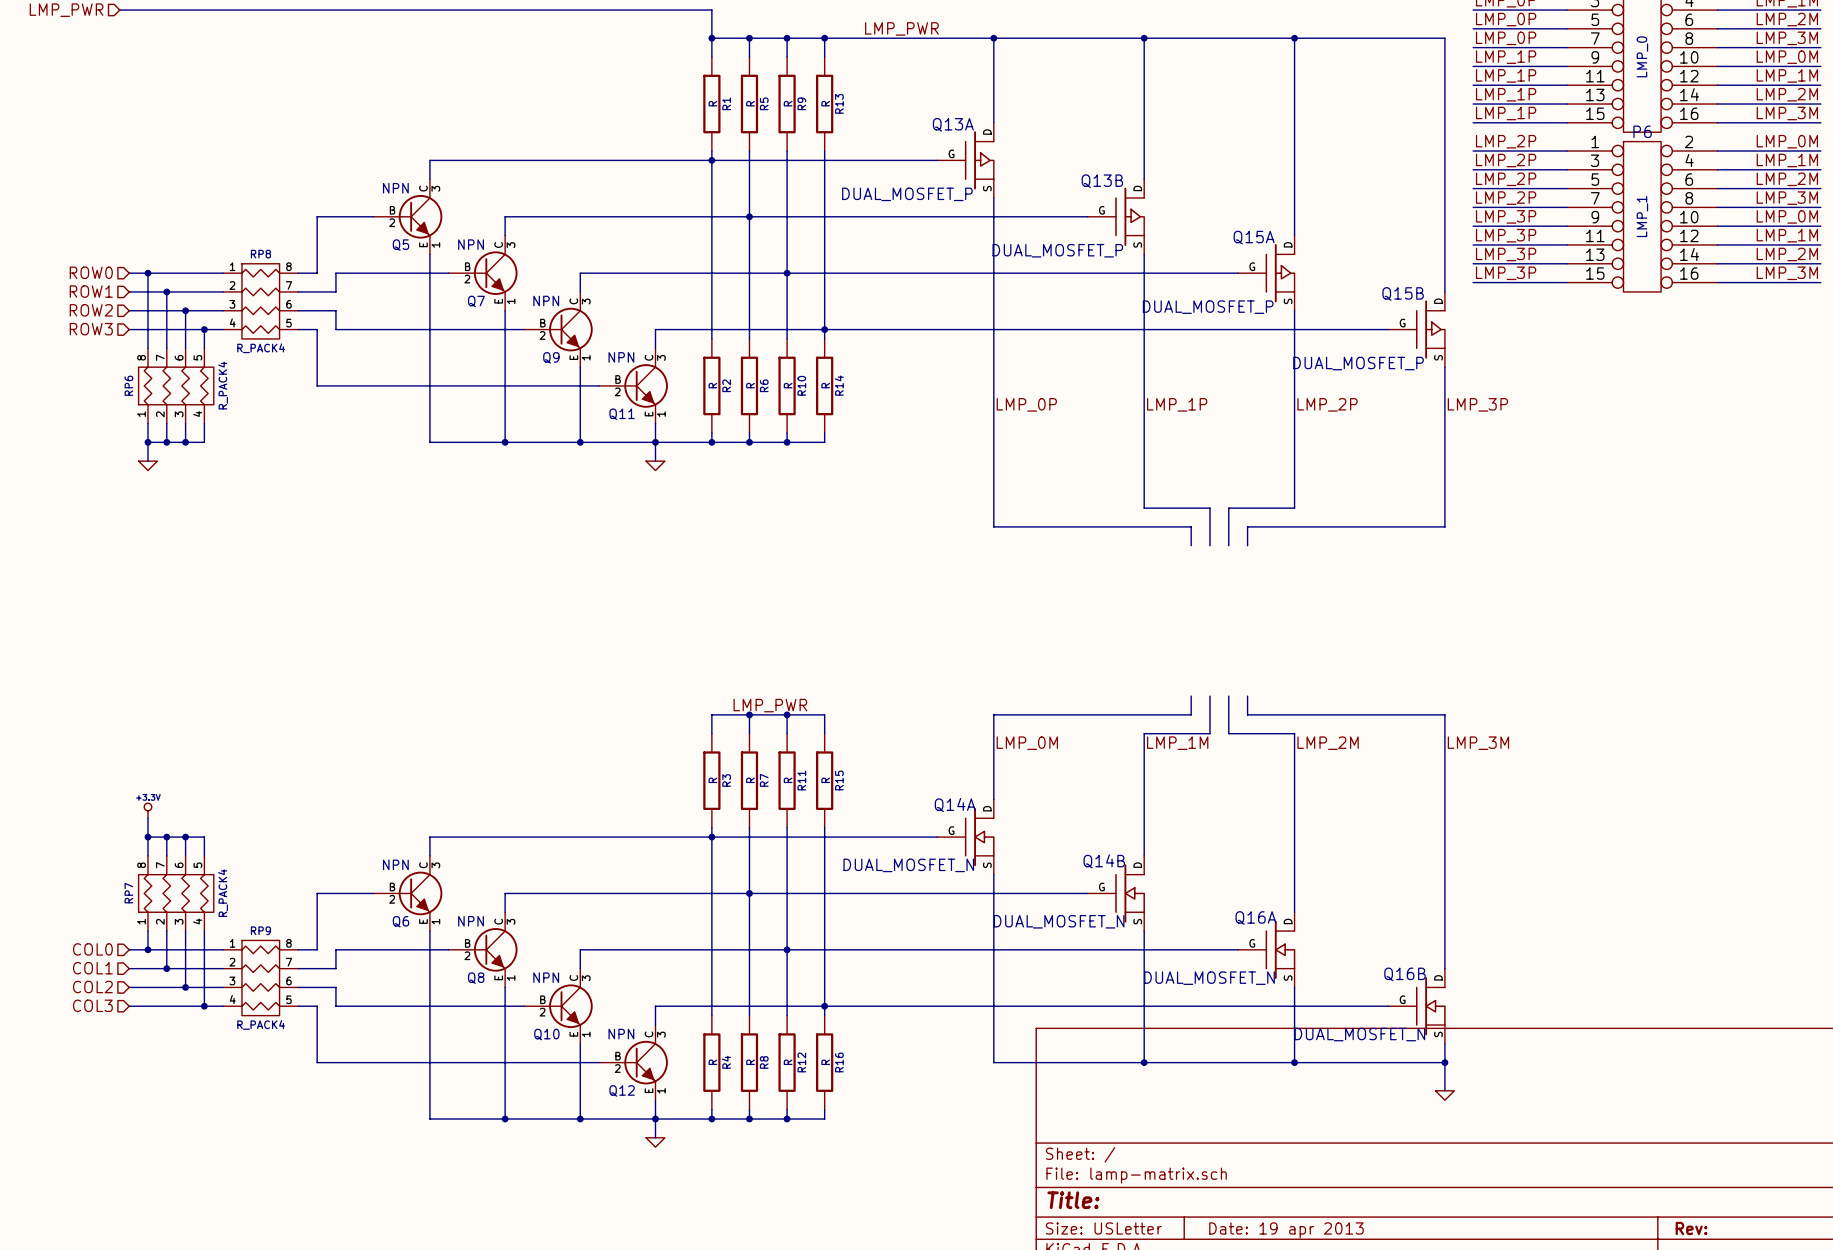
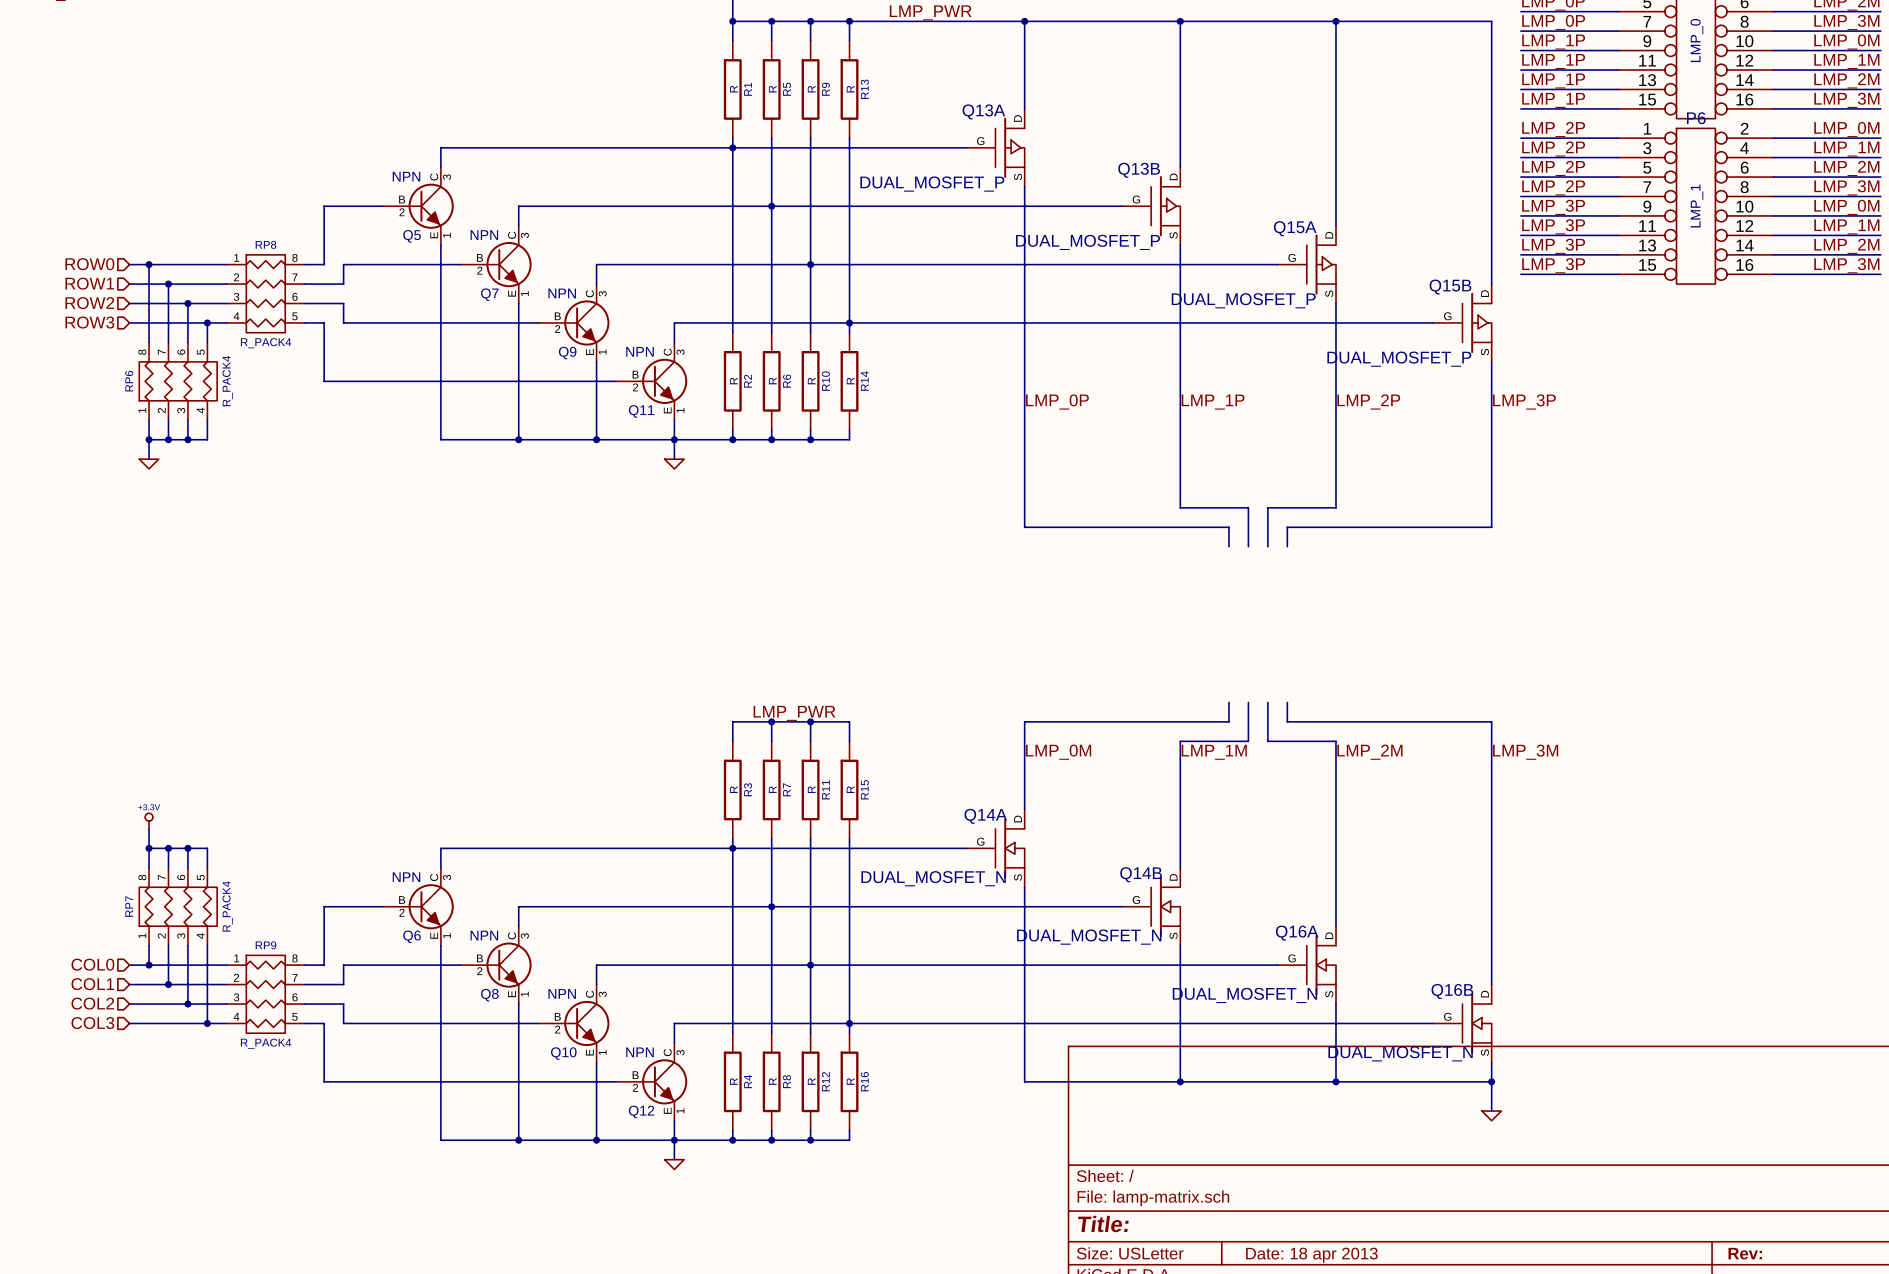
title block: Date: 19 apr 2013 (1286, 1230) -> Date: 18 apr 2013 (1311, 1255)

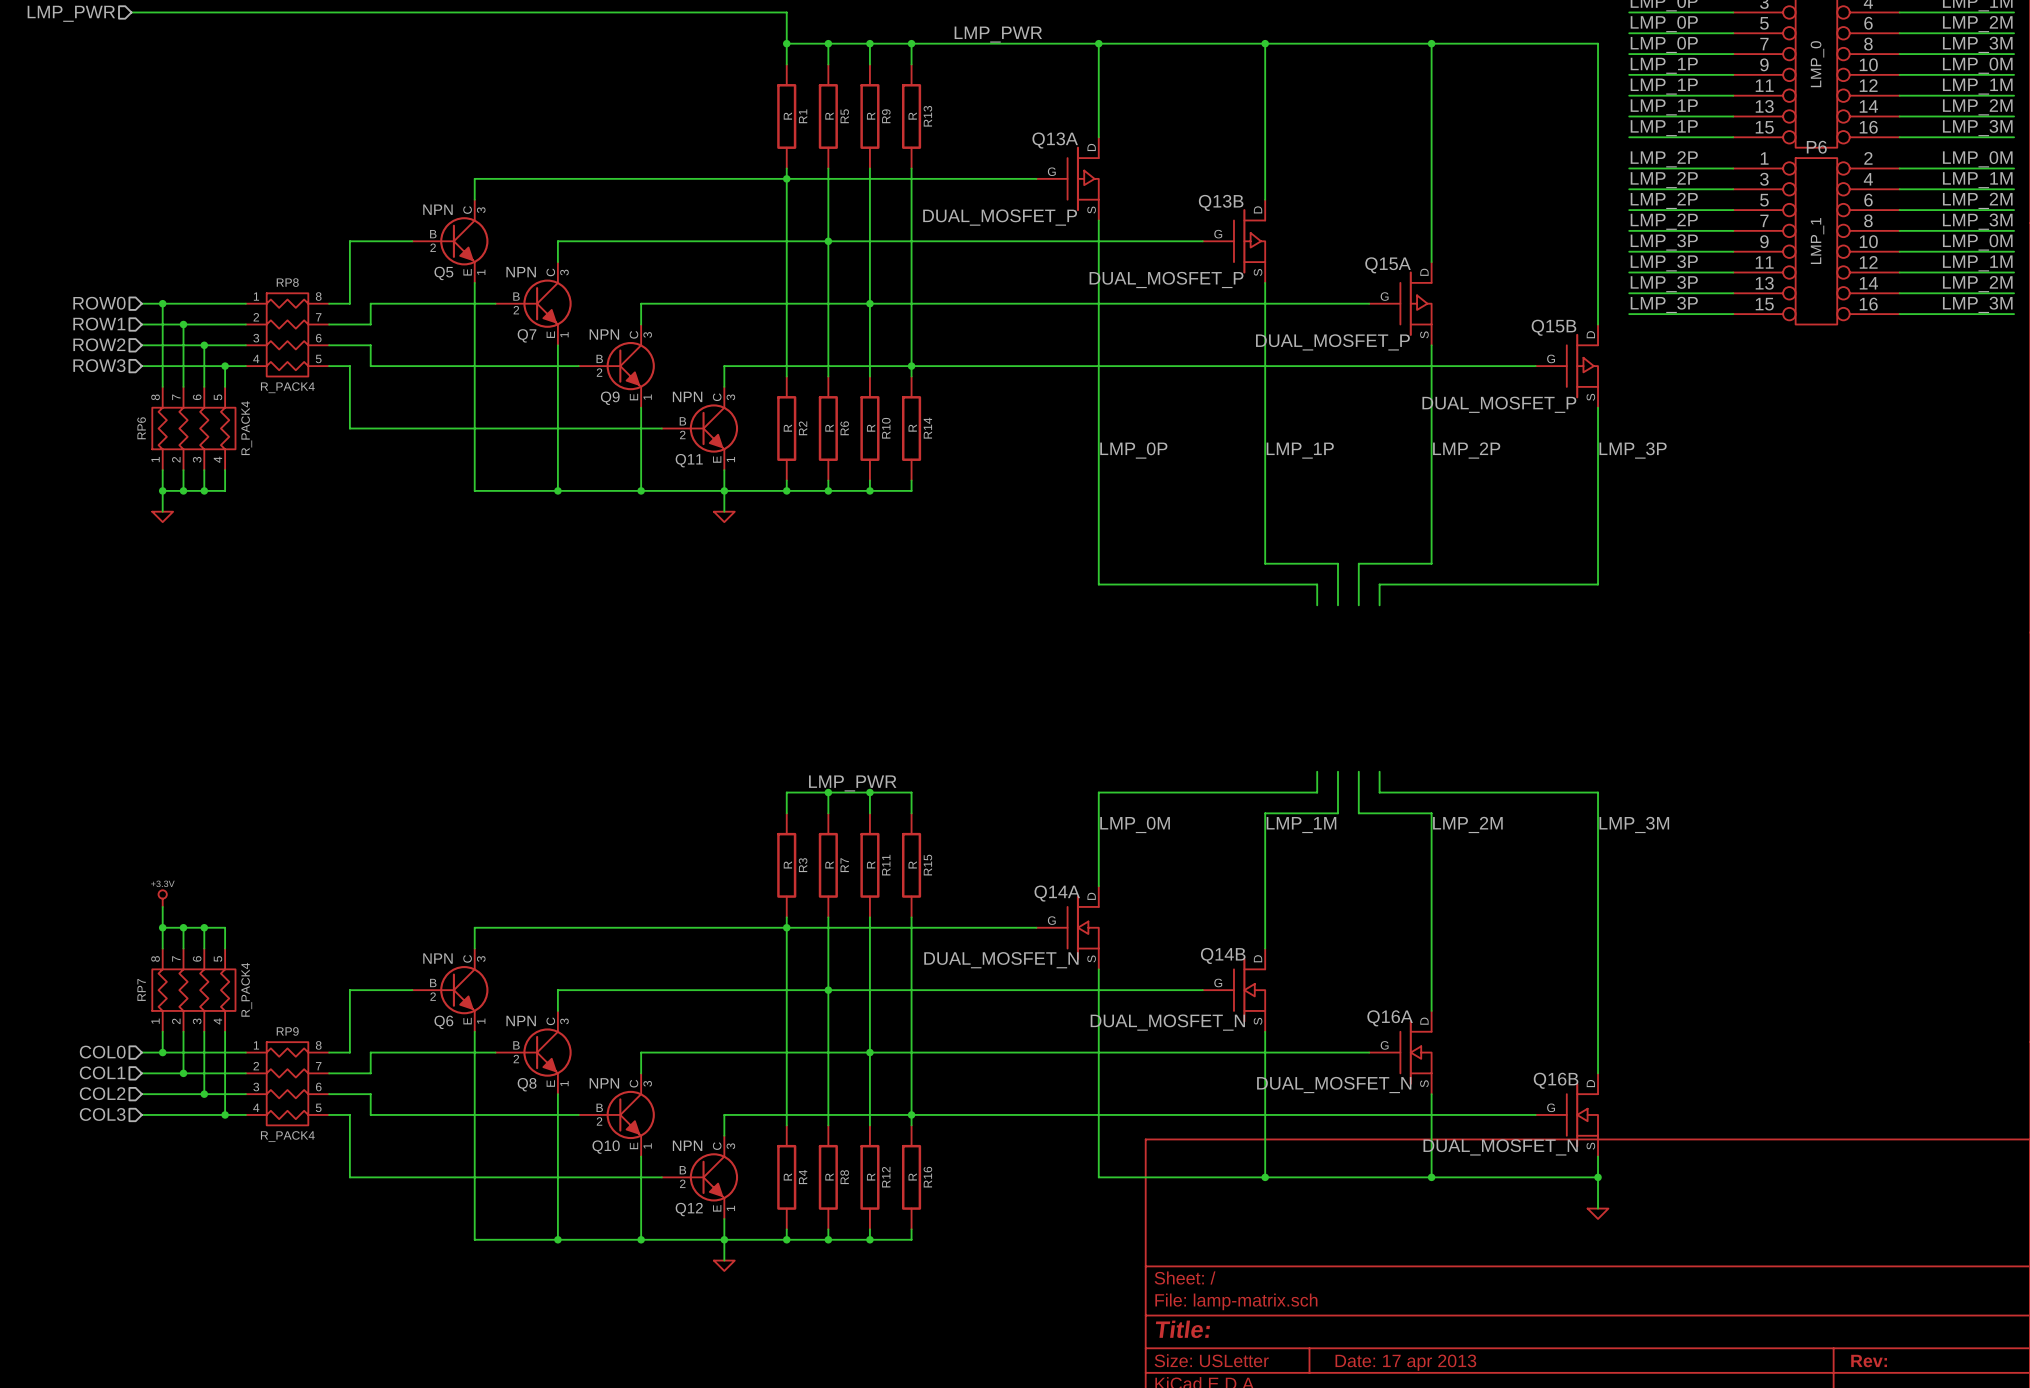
title block: Date: 18 apr 2013 (1311, 1255) -> Date: 17 apr 2013 (1405, 1362)

